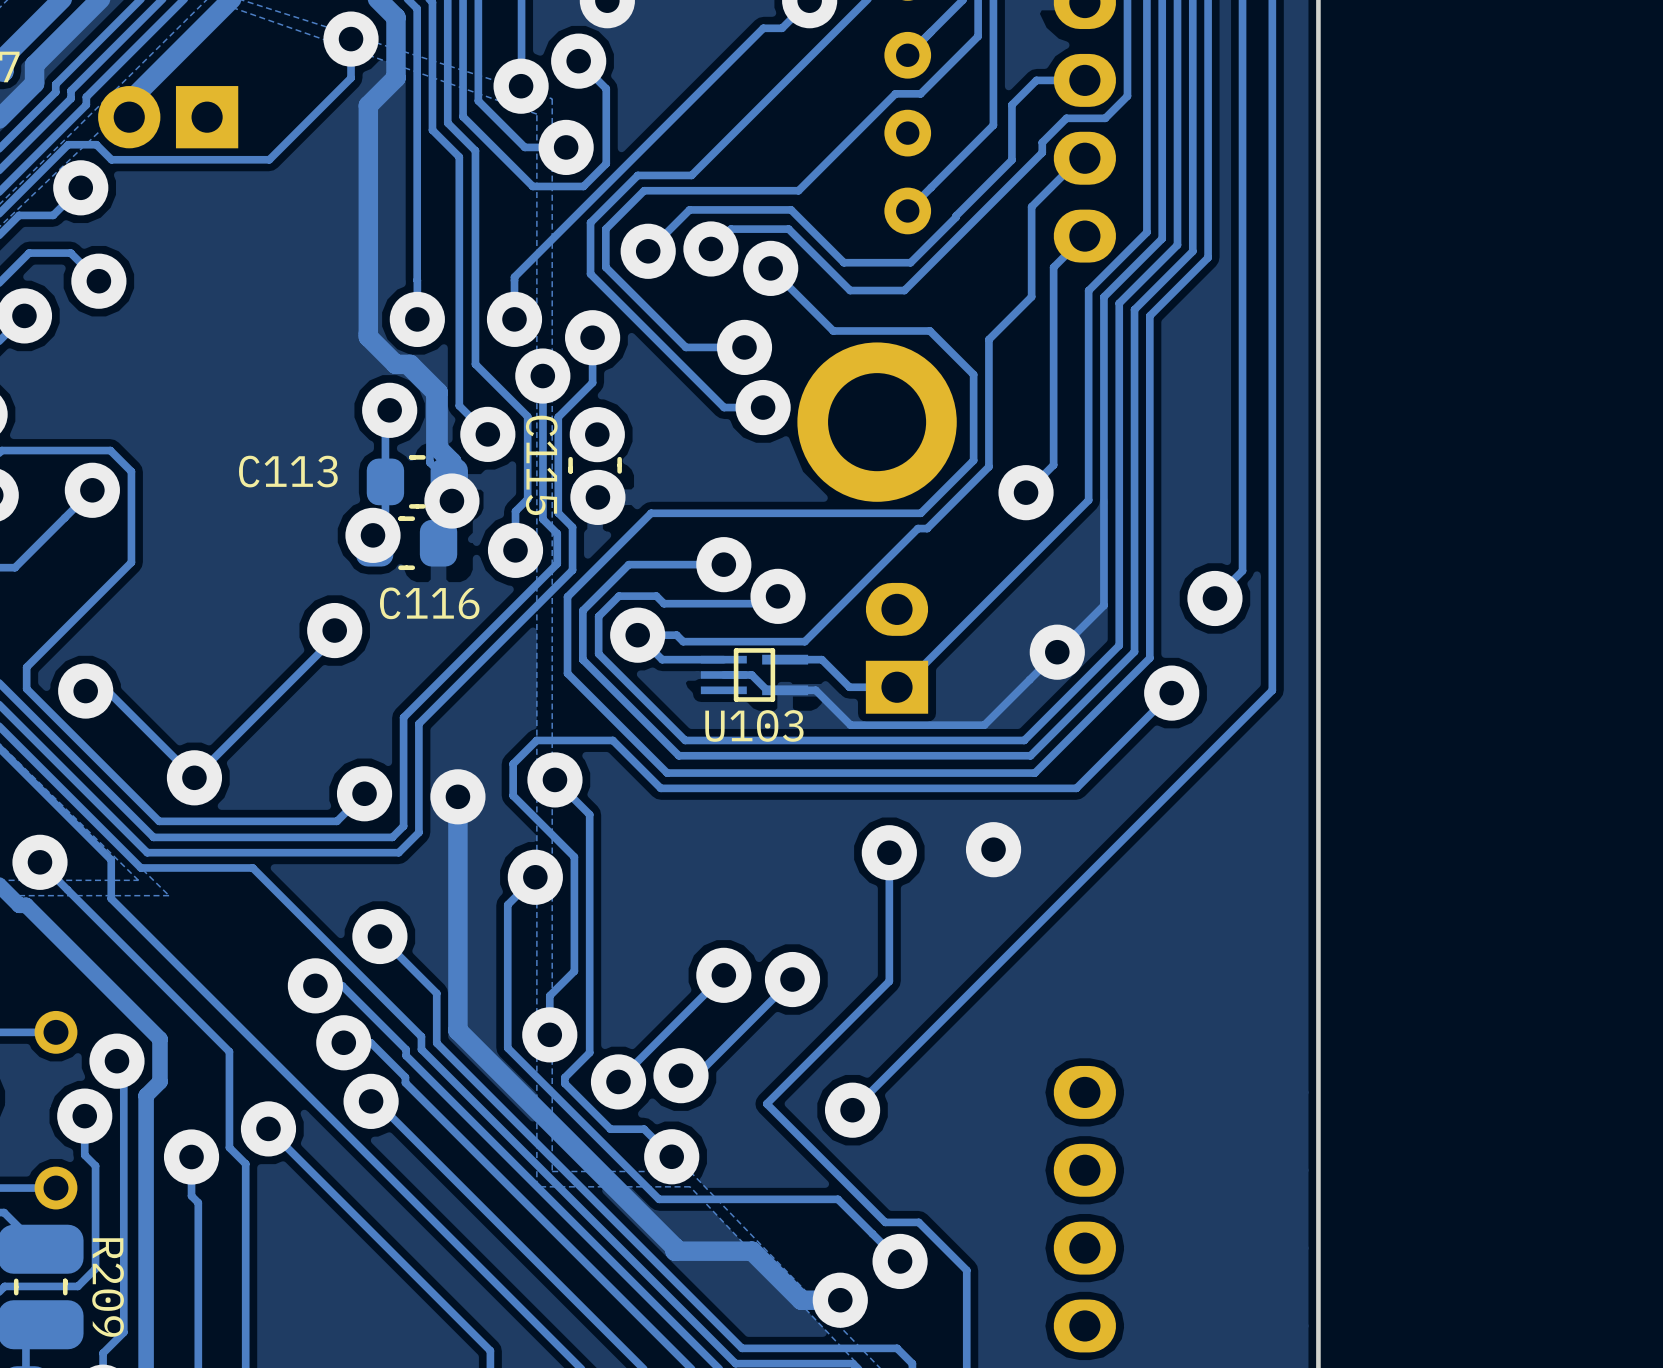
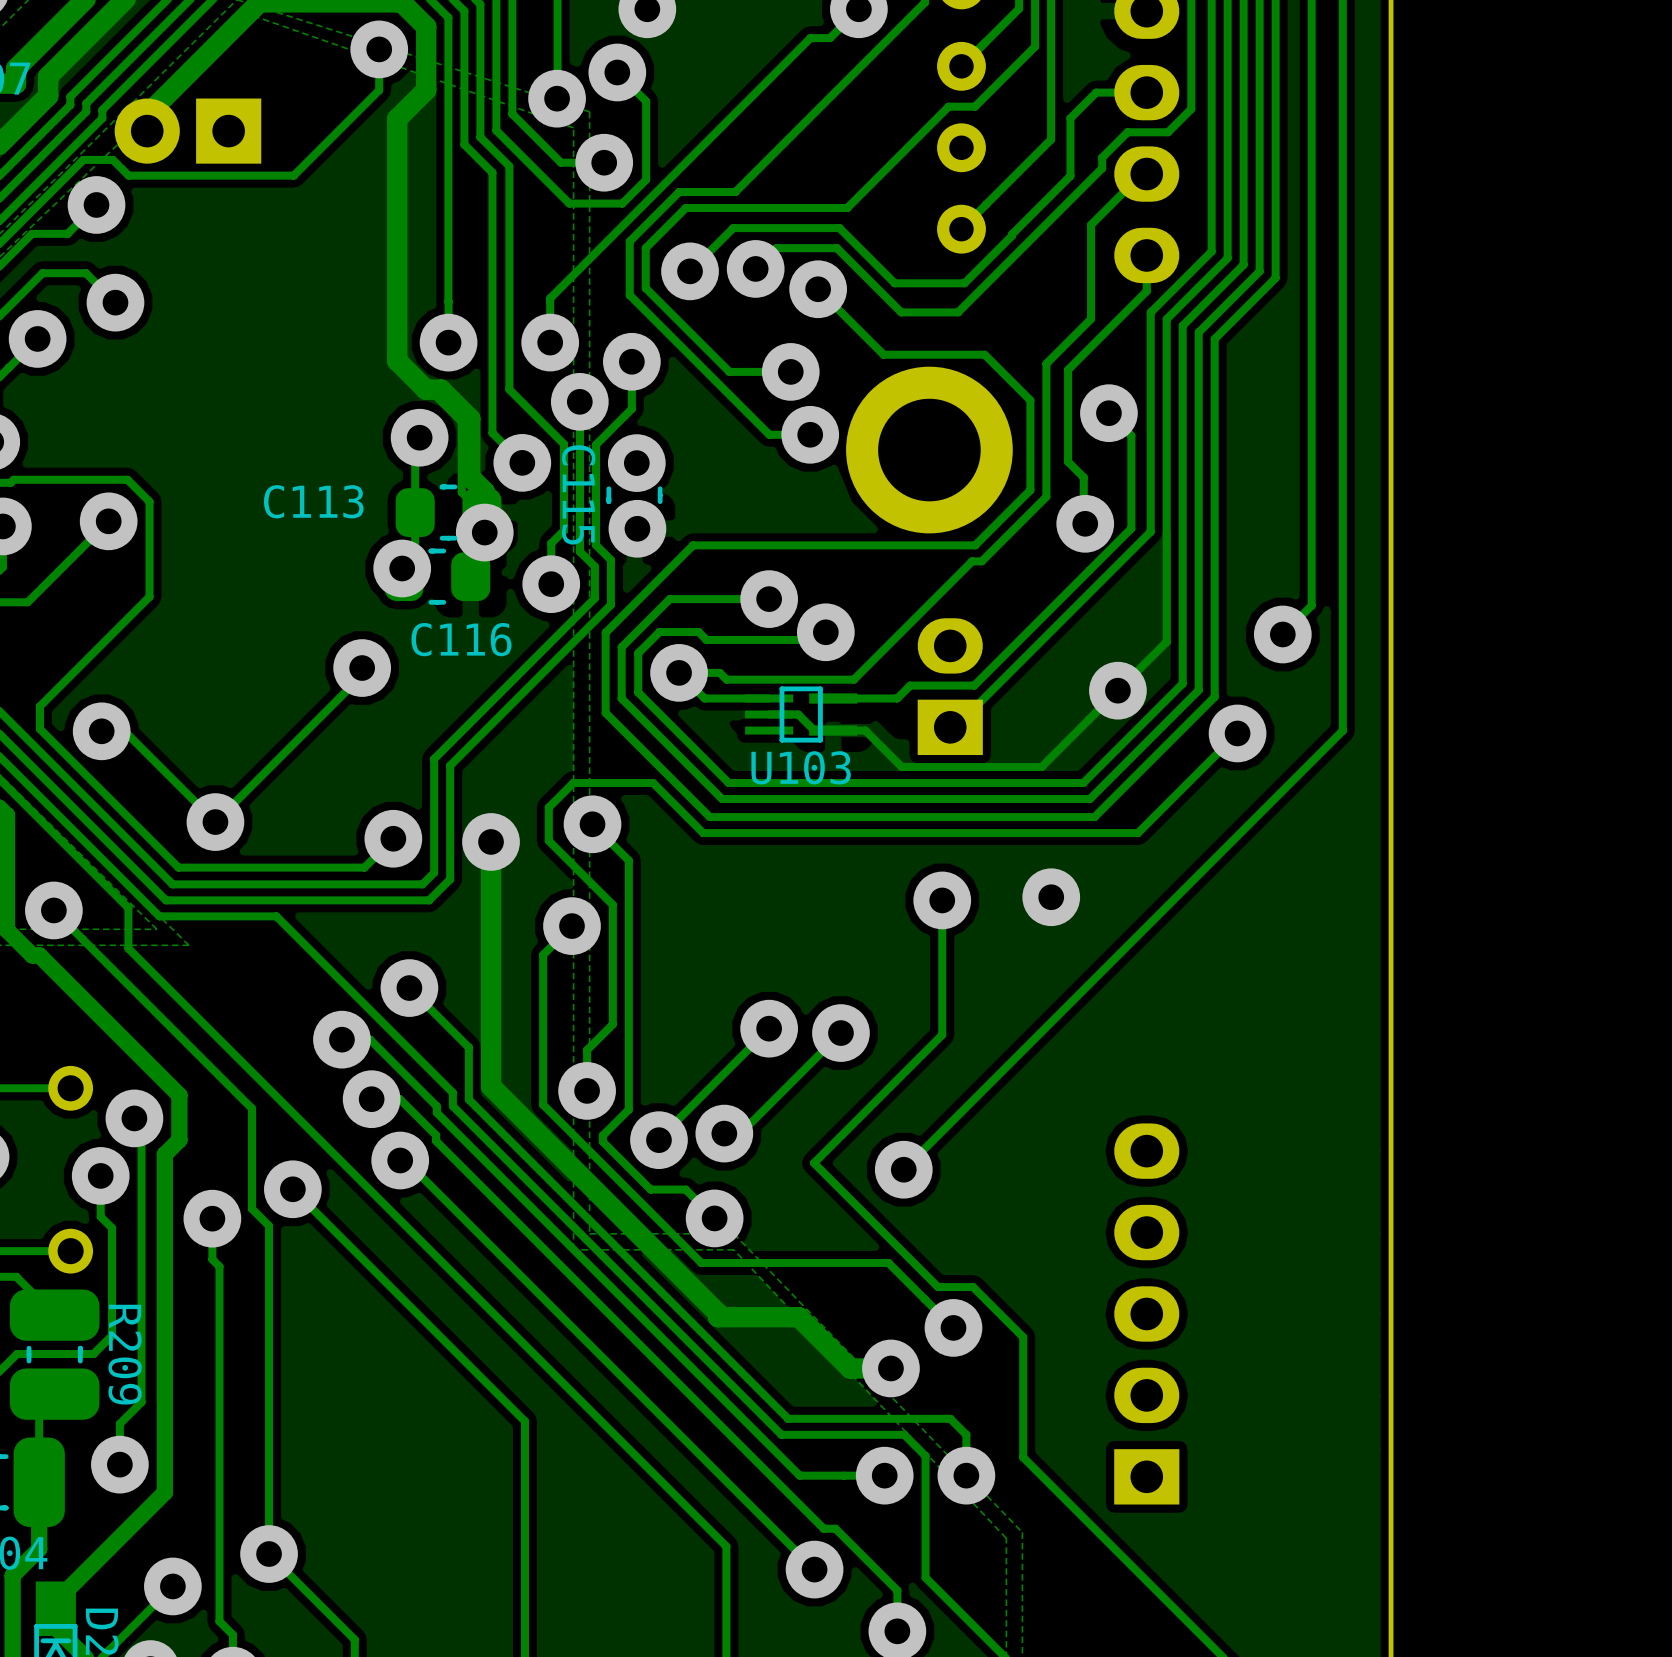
track: (1084, 236) (1053, 267) (1053, 465) (1026, 492) -> (1146, 255) (1146, 291) (1068, 369) (1068, 461) (1083, 477) (1083, 518)
via: none -> (1108, 413)
track: (821, 659) (849, 687) (897, 687) -> (871, 698) (897, 698) (910, 685) (974, 685) (1131, 528) (1131, 435) (1108, 413)

